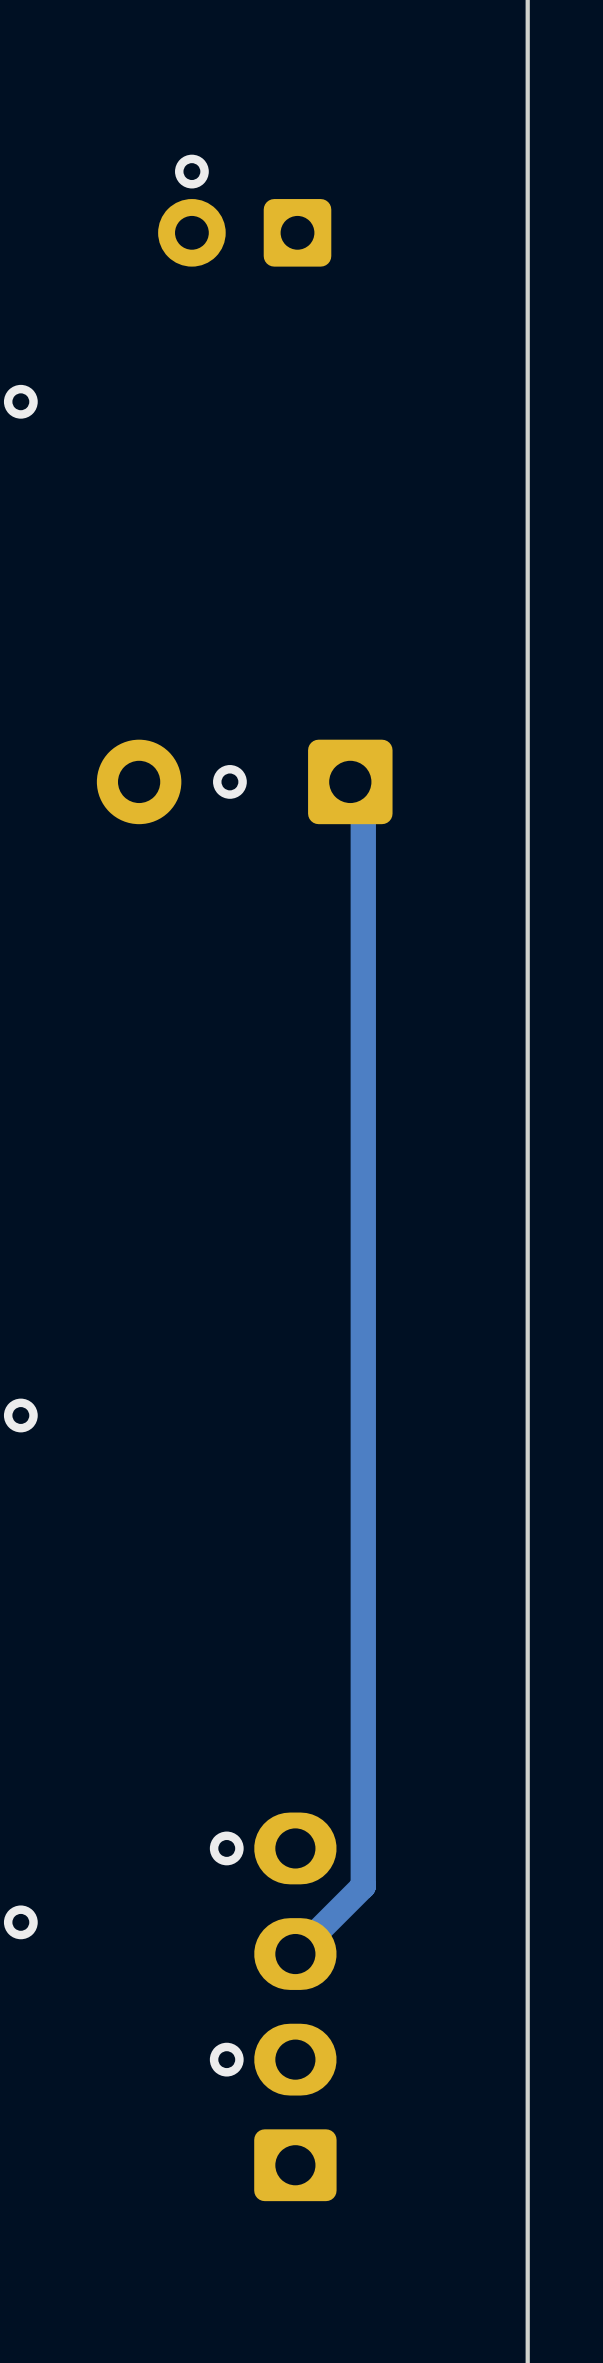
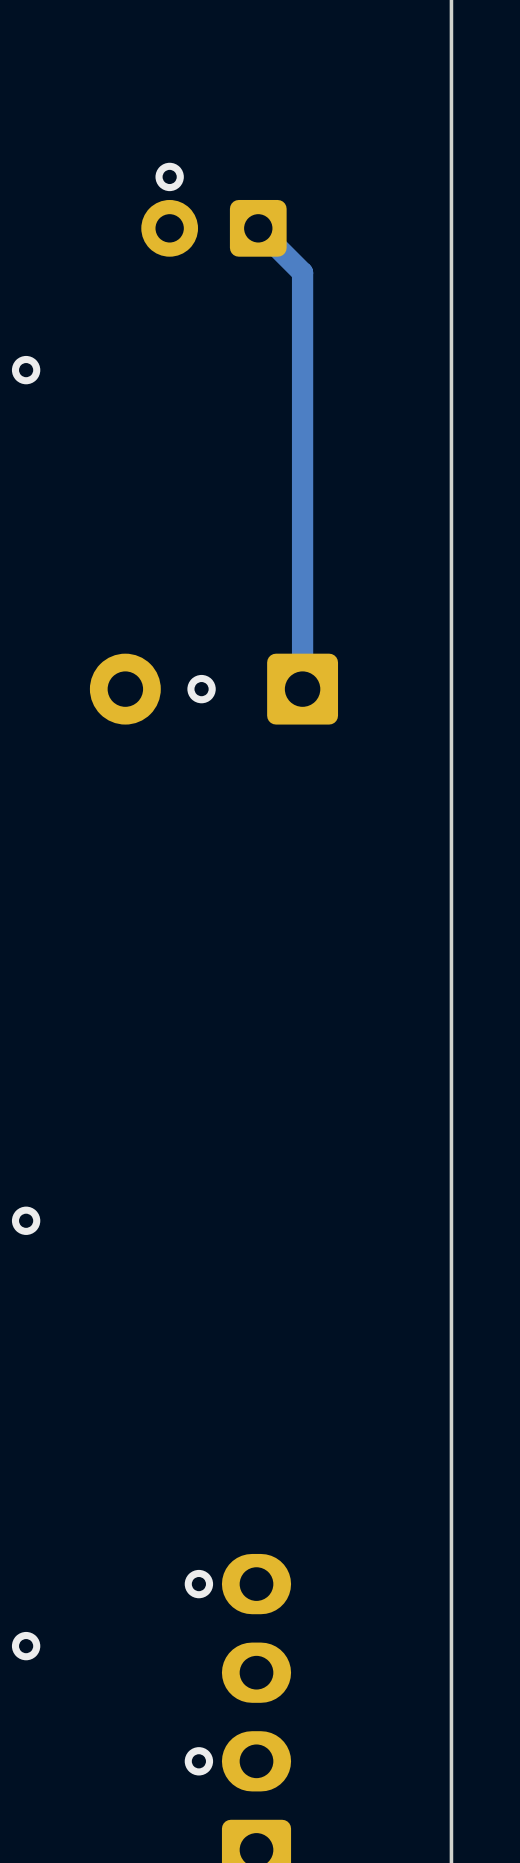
track: (350, 781) (363, 794) (363, 1886) (295, 1954) -> (302, 689) (302, 272) (258, 228)

